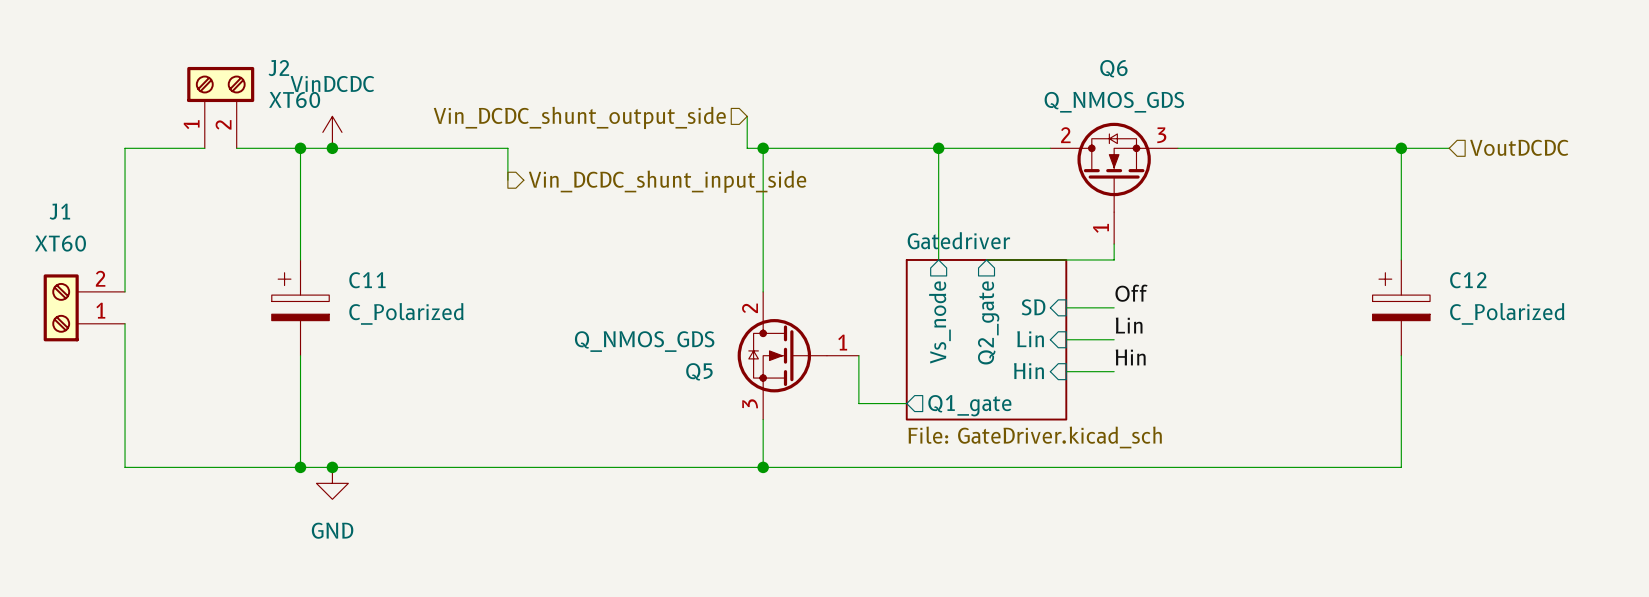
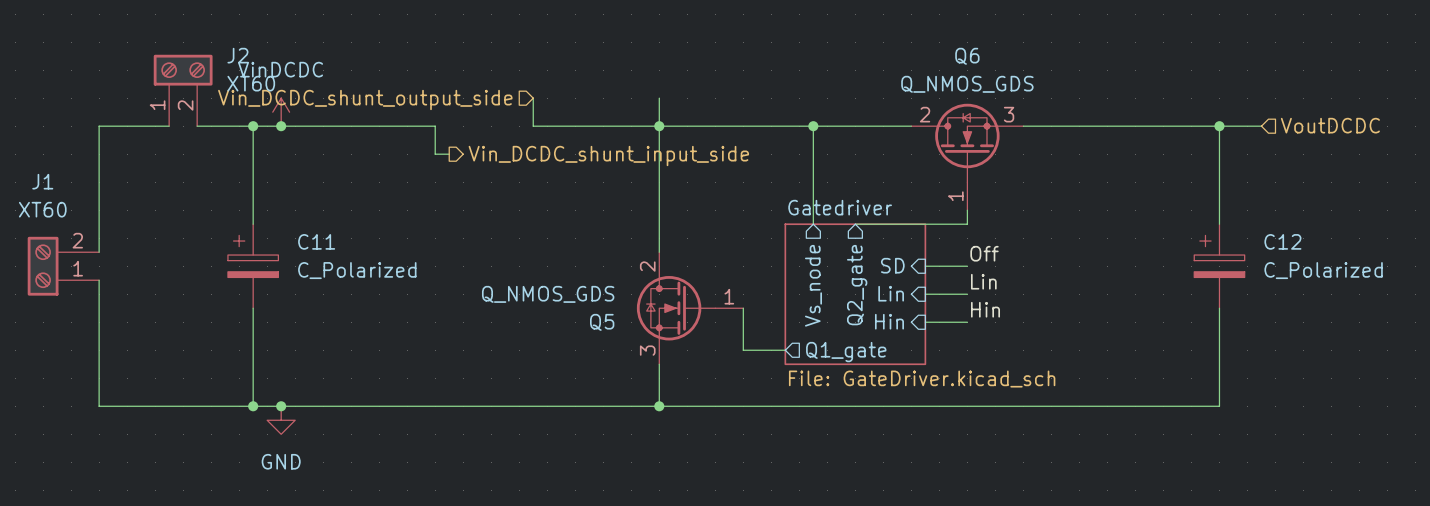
wire: (747, 116) (747, 148) -> (533, 98) (533, 126) (645, 126)
wire: none -> (659, 98) (659, 126)
hierarchical label position: Vin_DCDC_shunt_output_side (579, 117) -> Vin_DCDC_shunt_output_side (365, 99)
wire: none -> (435, 154) (449, 154)
hierarchical label position: Vin_DCDC_shunt_input_side (667, 181) -> Vin_DCDC_shunt_input_side (608, 156)

